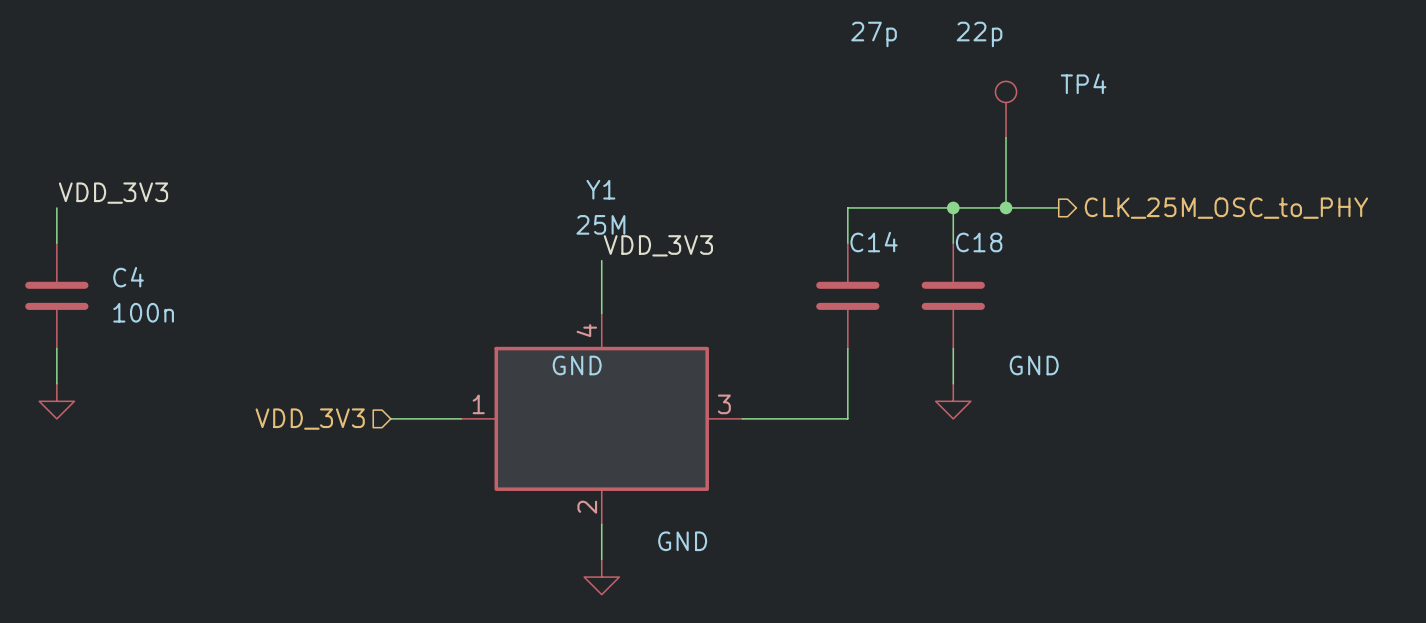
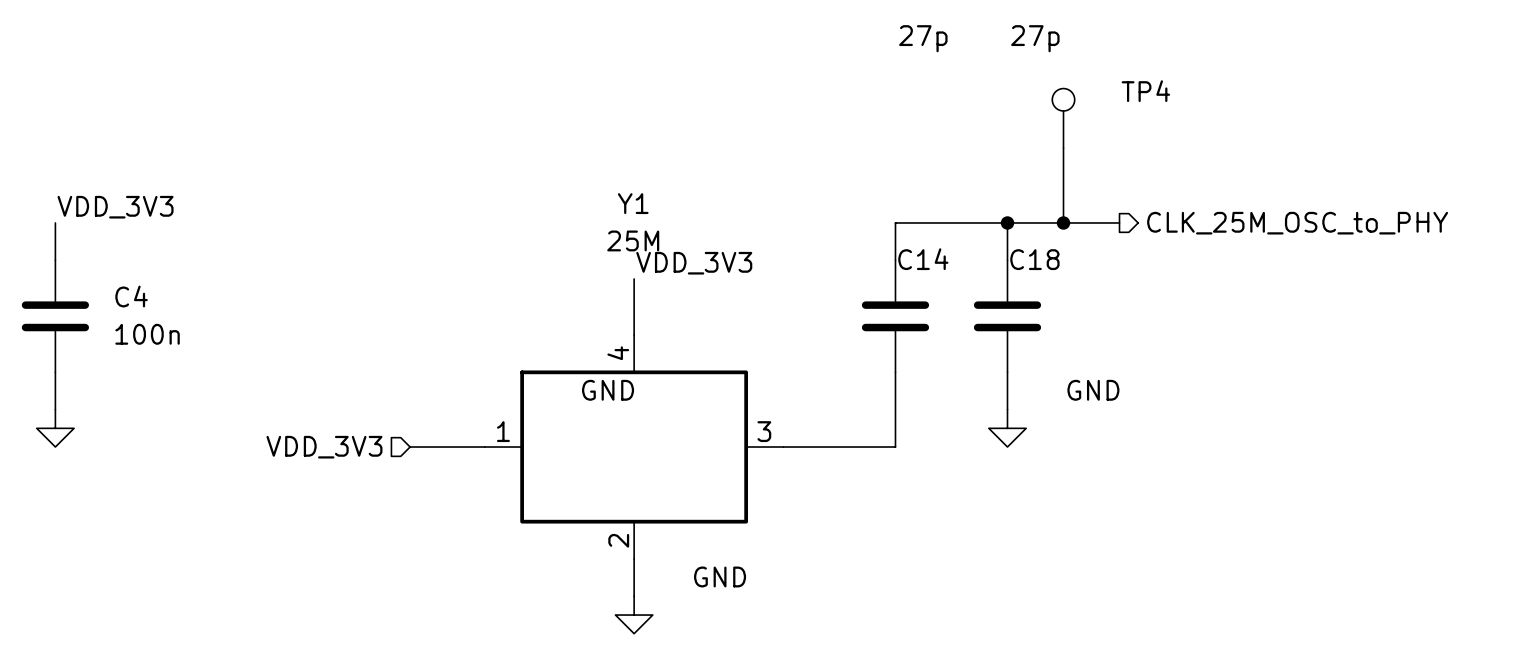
C18 value: 22p (979, 34) -> 27p (1035, 38)

